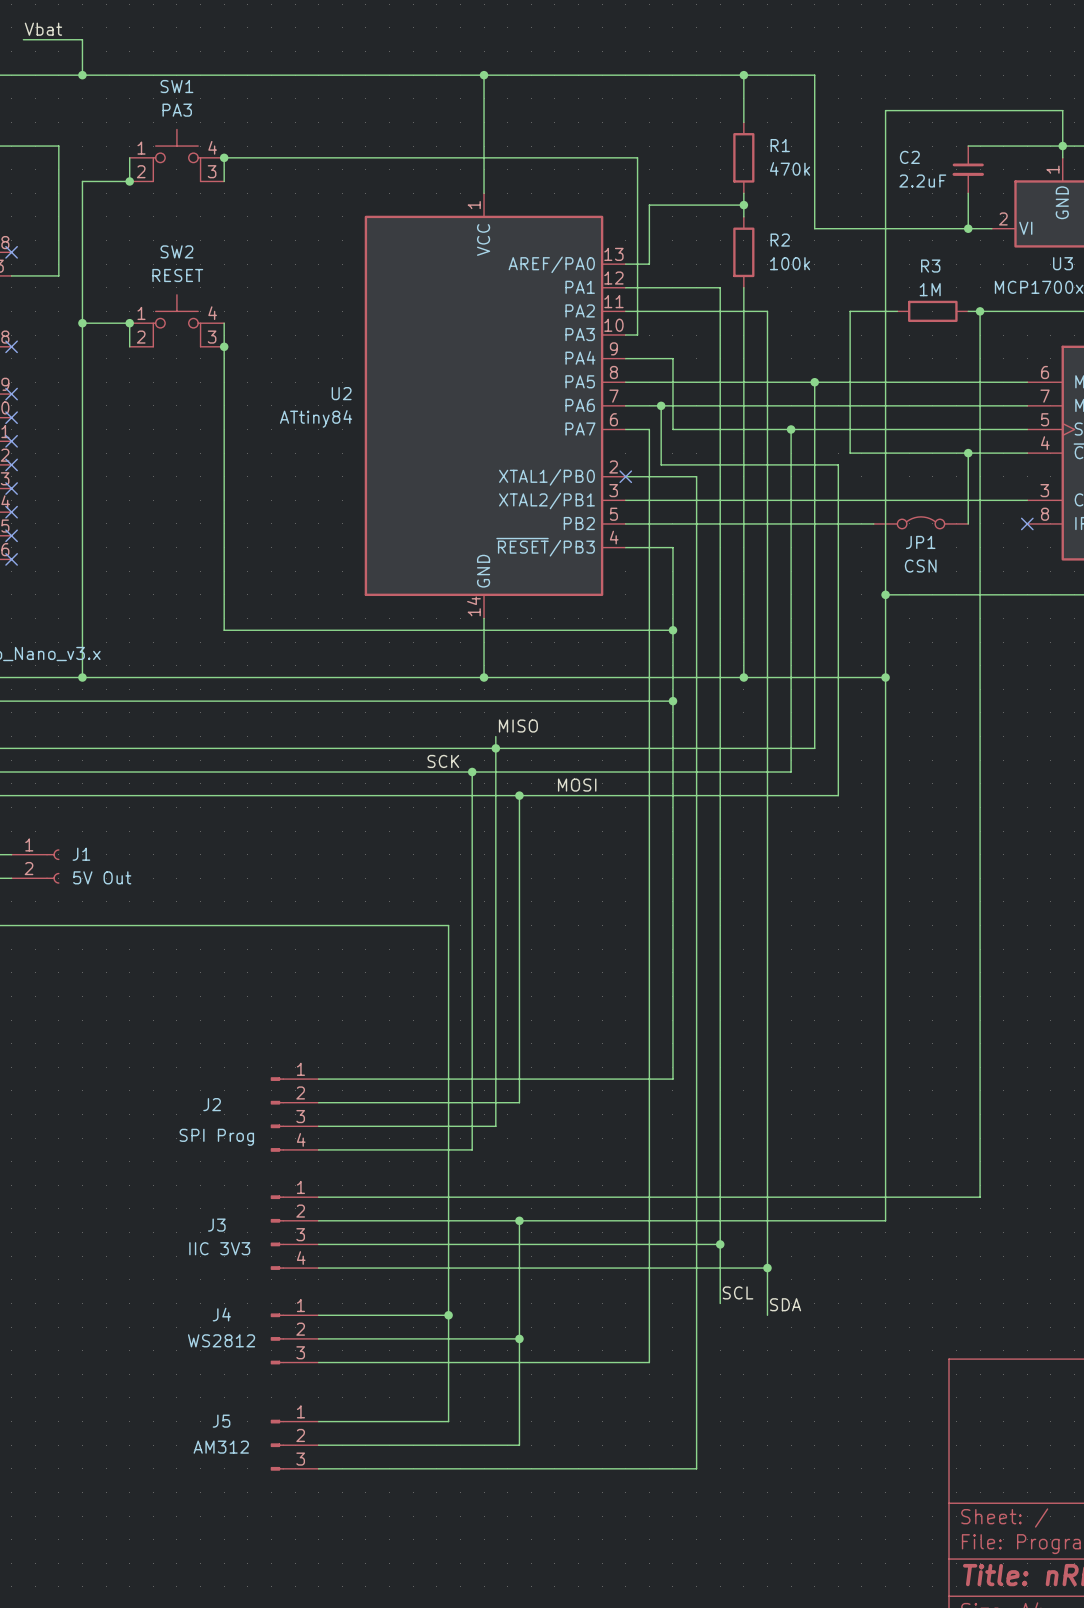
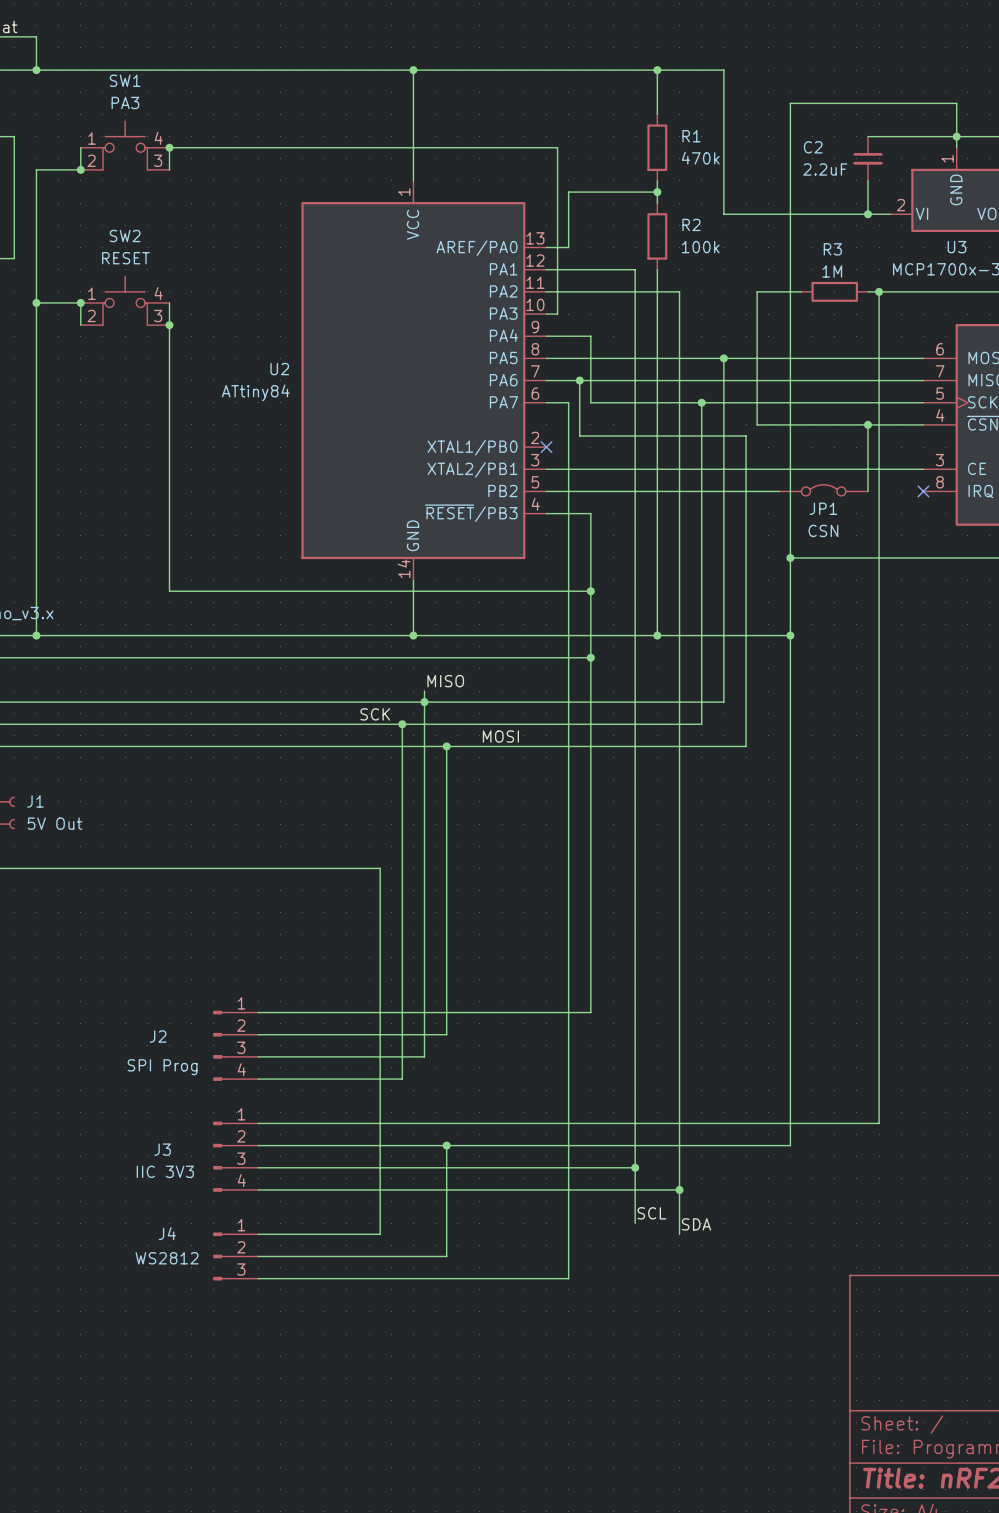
wire: (625, 476) (696, 476) (696, 1468) (318, 1468) -> none
wire: (448, 1315) (448, 1421) (318, 1421) -> none
junction: (448, 1315) -> none
wire: (519, 1338) (519, 1445) (318, 1445) -> none
junction: (519, 1338) -> none
J5: AM312 (294, 1445) -> none

